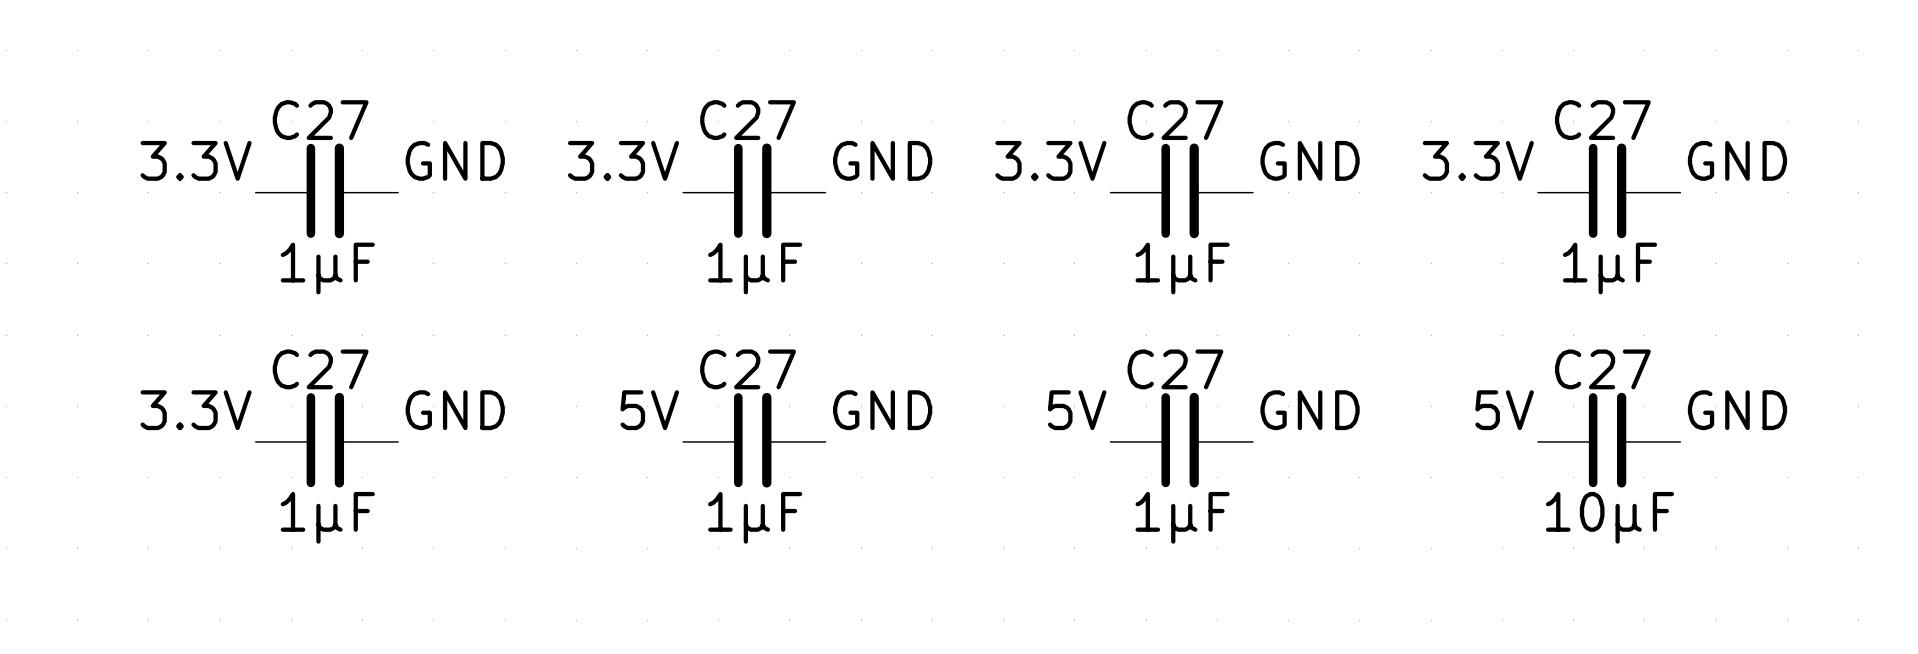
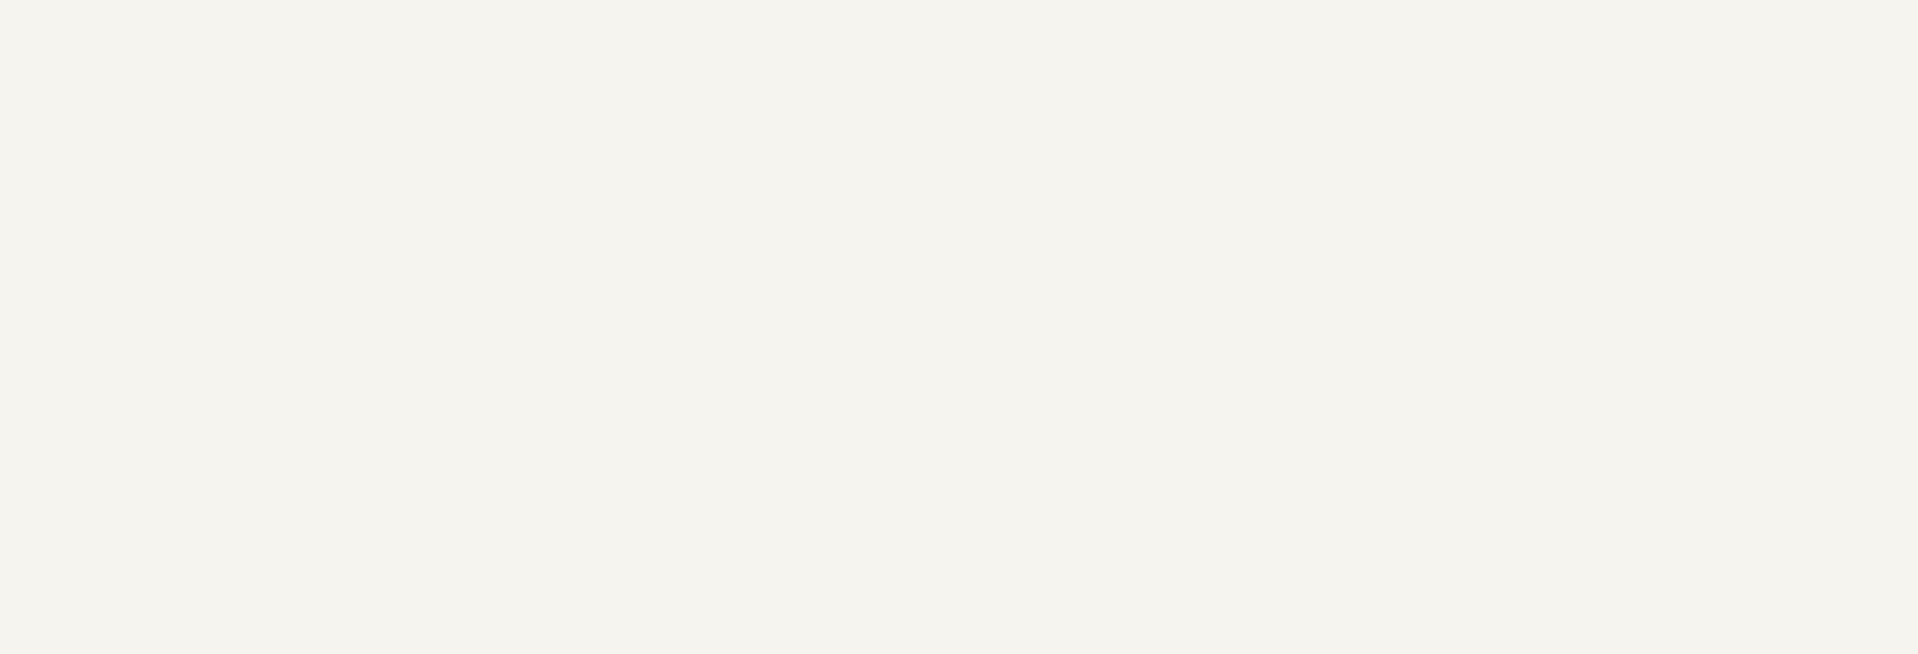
label: 3.3V (196, 160) -> none
label: GND (455, 160) -> none
label: 3.3V (623, 160) -> none
label: GND (882, 160) -> none
label: 3.3V (1050, 160) -> none
label: GND (1310, 160) -> none
label: 3.3V (1478, 160) -> none
label: GND (1737, 160) -> none
C27: 1μF (326, 190) -> none
C27: 1μF (754, 190) -> none
C27: 1μF (1181, 190) -> none
C27: 1μF (1609, 190) -> none
label: 3.3V (196, 410) -> none
label: GND (455, 410) -> none
label: 5V (649, 410) -> none
label: GND (882, 410) -> none
label: 5V (1077, 410) -> none
label: GND (1310, 410) -> none
label: 5V (1504, 410) -> none
label: GND (1737, 410) -> none
C27: 1μF (326, 440) -> none
C27: 1μF (754, 440) -> none
C27: 1μF (1181, 440) -> none
C27: 10μF (1609, 440) -> none

